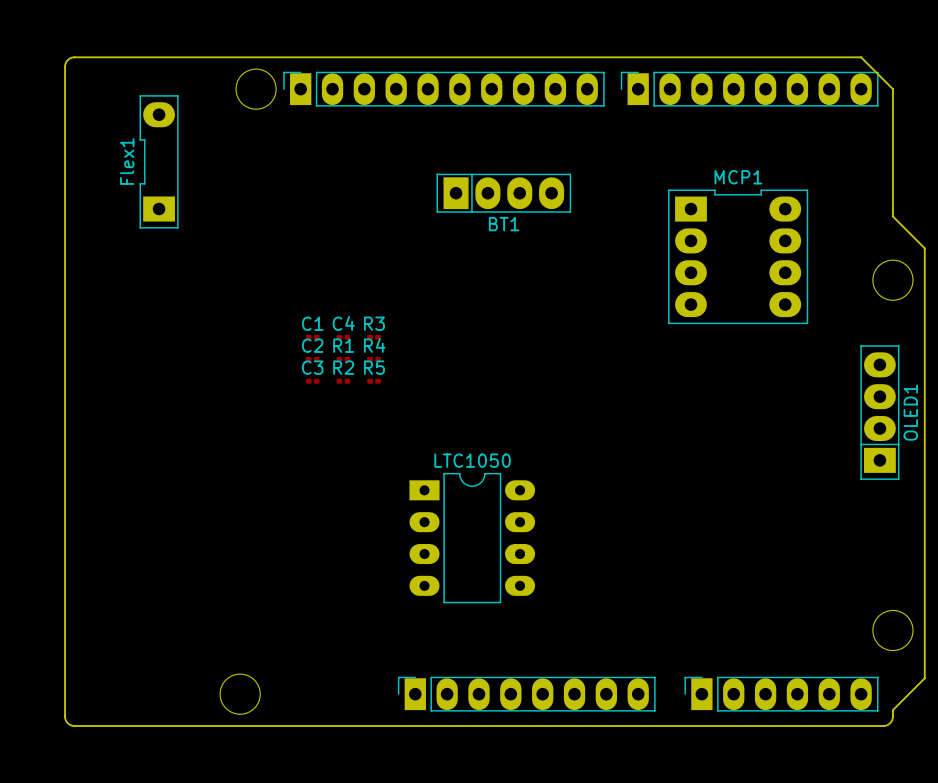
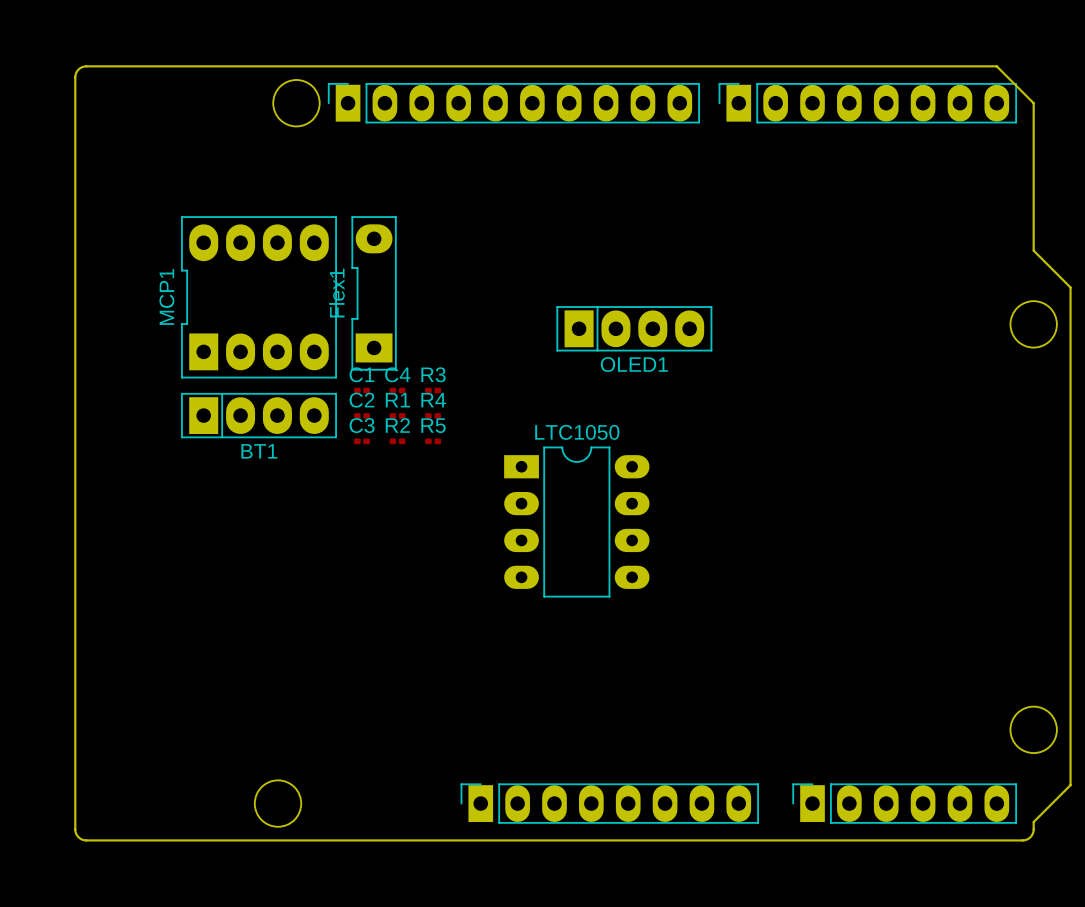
Flex1 position: (159, 161) -> (374, 293)
BT1 position: (503, 193) -> (259, 415)
MCP1 rotation: 0° (738, 256) -> 90° counterclockwise (259, 297)
MCP1 position: (738, 256) -> (259, 297)
OLED1 rotation: 0° (879, 412) -> 90° clockwise (634, 328)
OLED1 position: (879, 412) -> (634, 328)
LTC1050 position: (472, 538) -> (576, 522)

